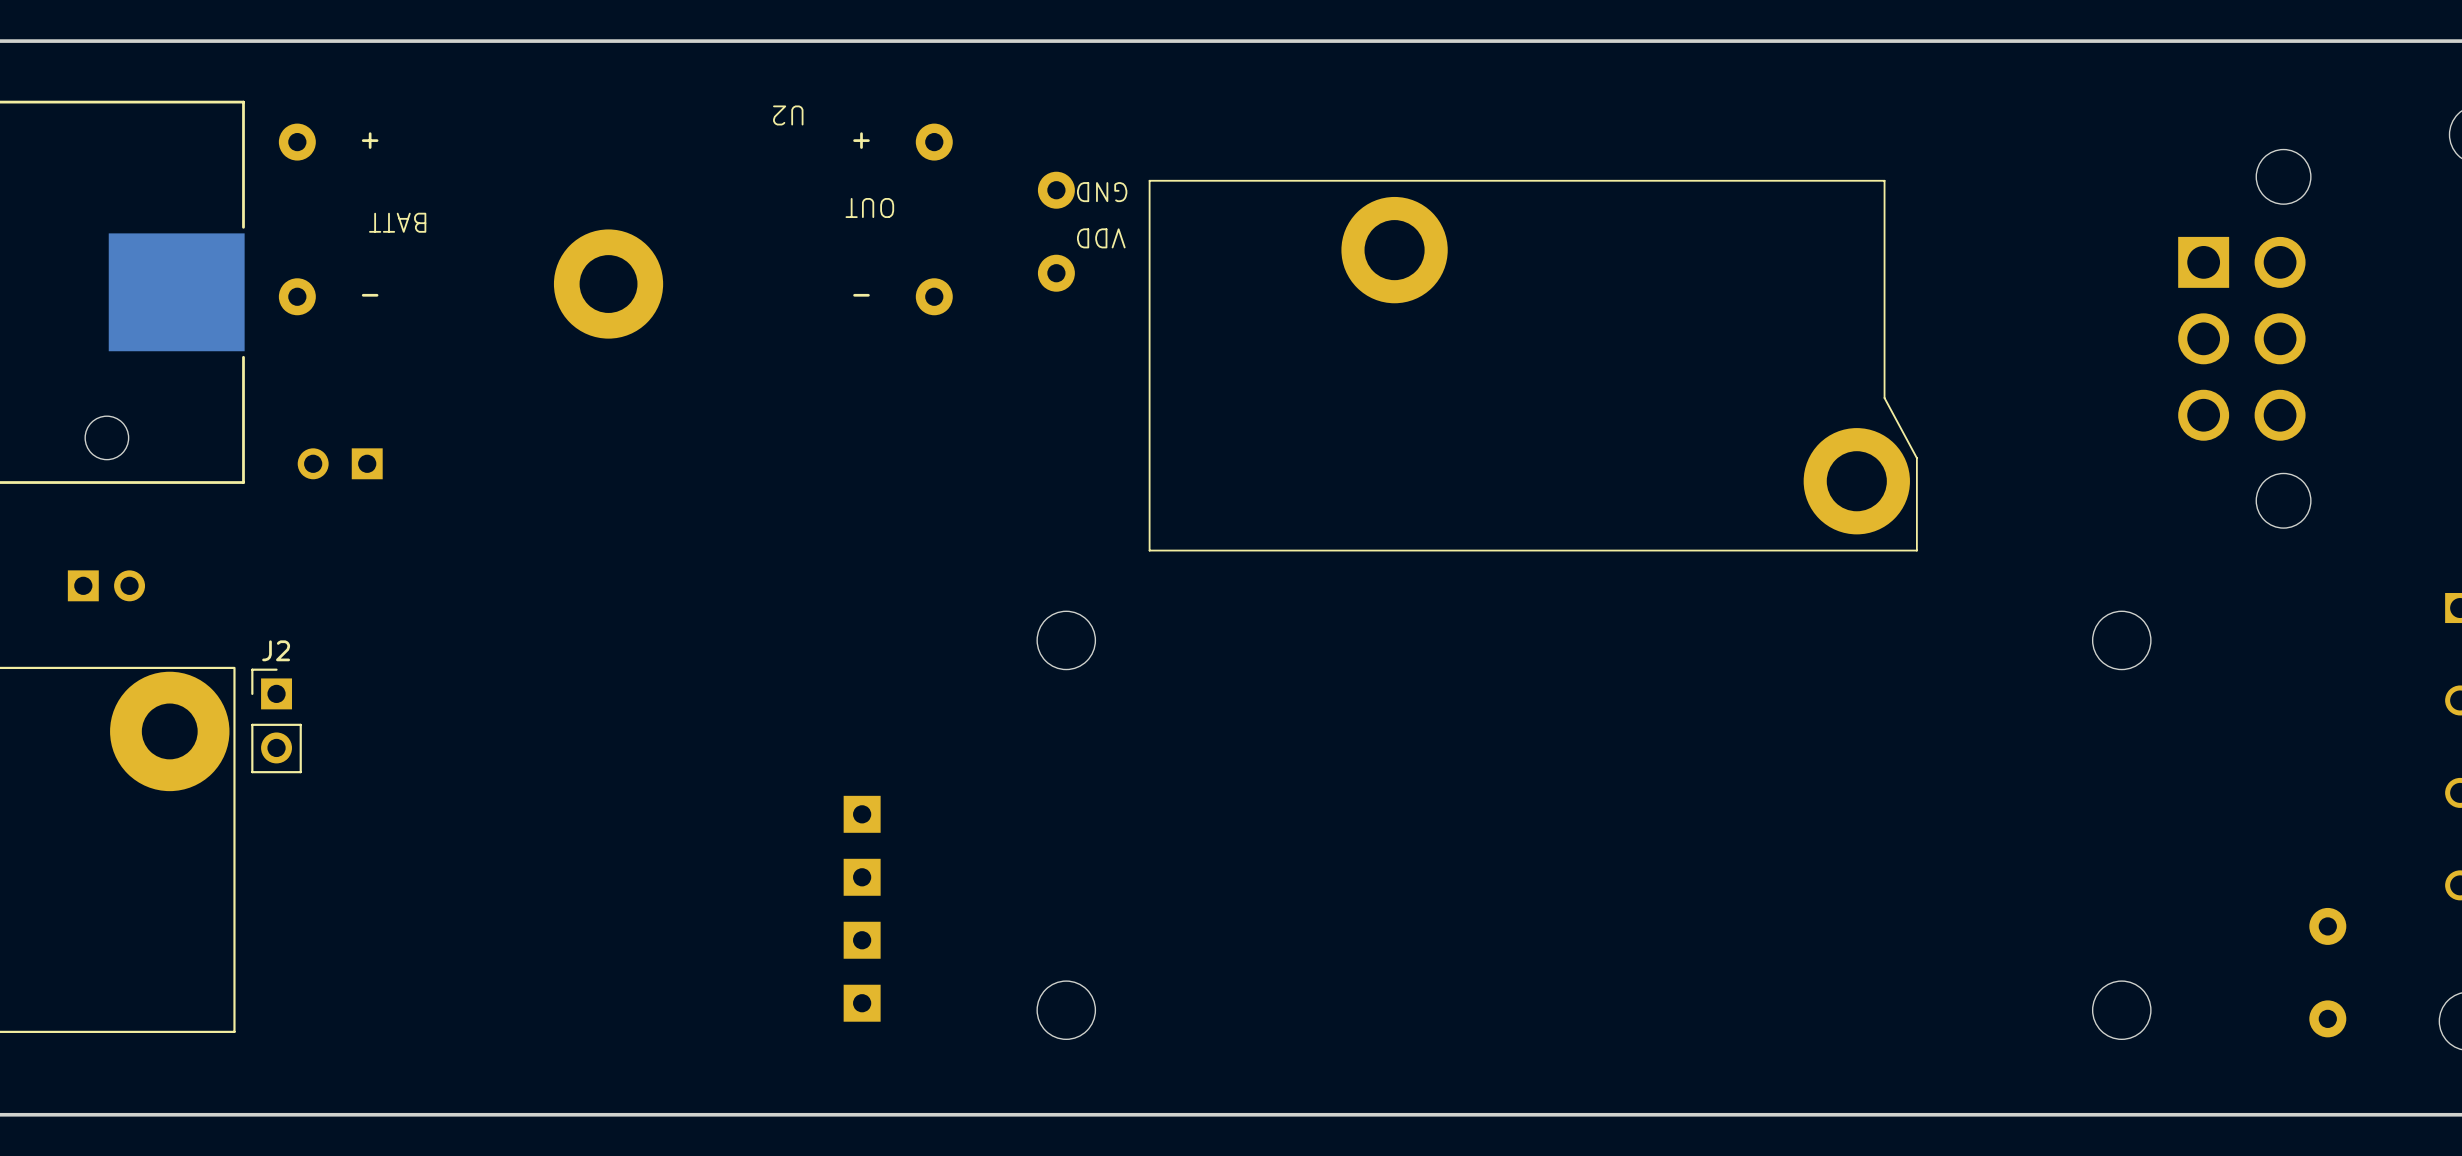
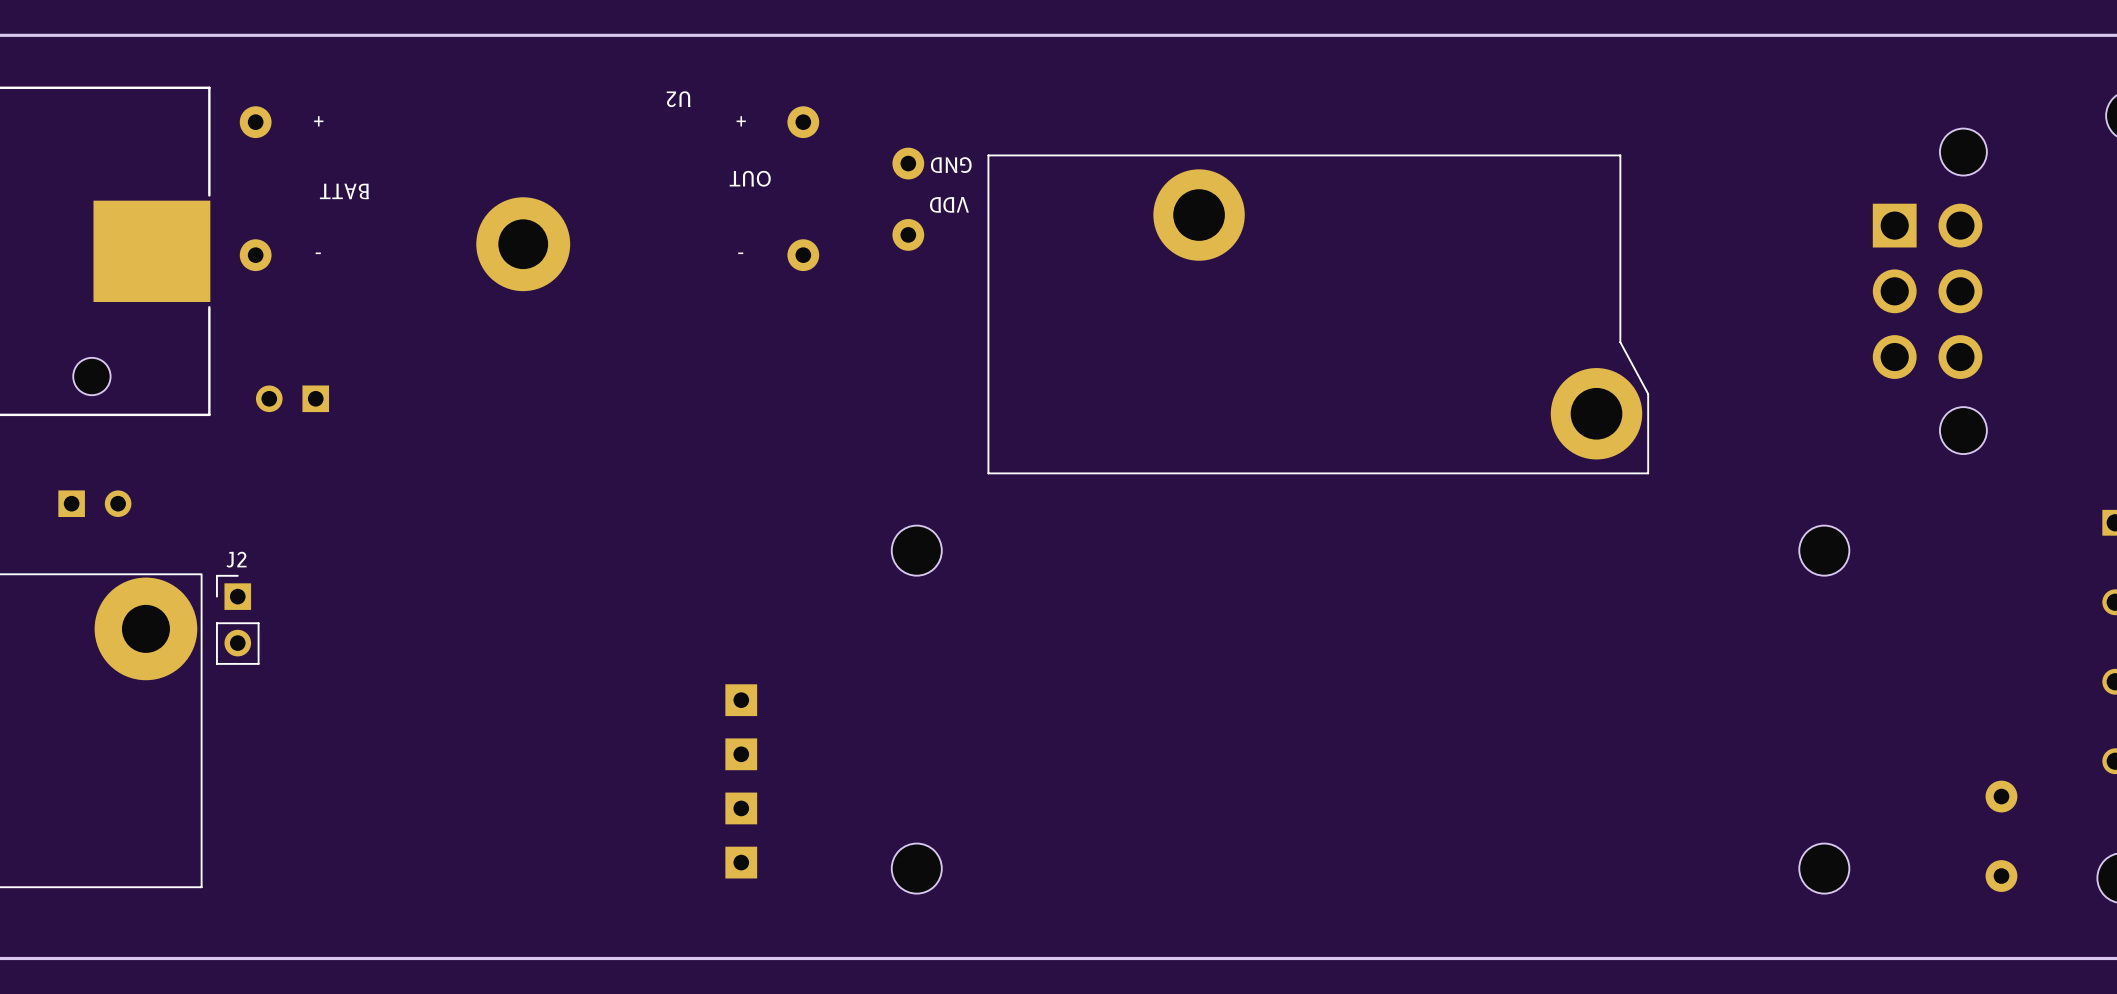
part footprint: [67, 570, 146, 602] -> [58, 490, 132, 518]

